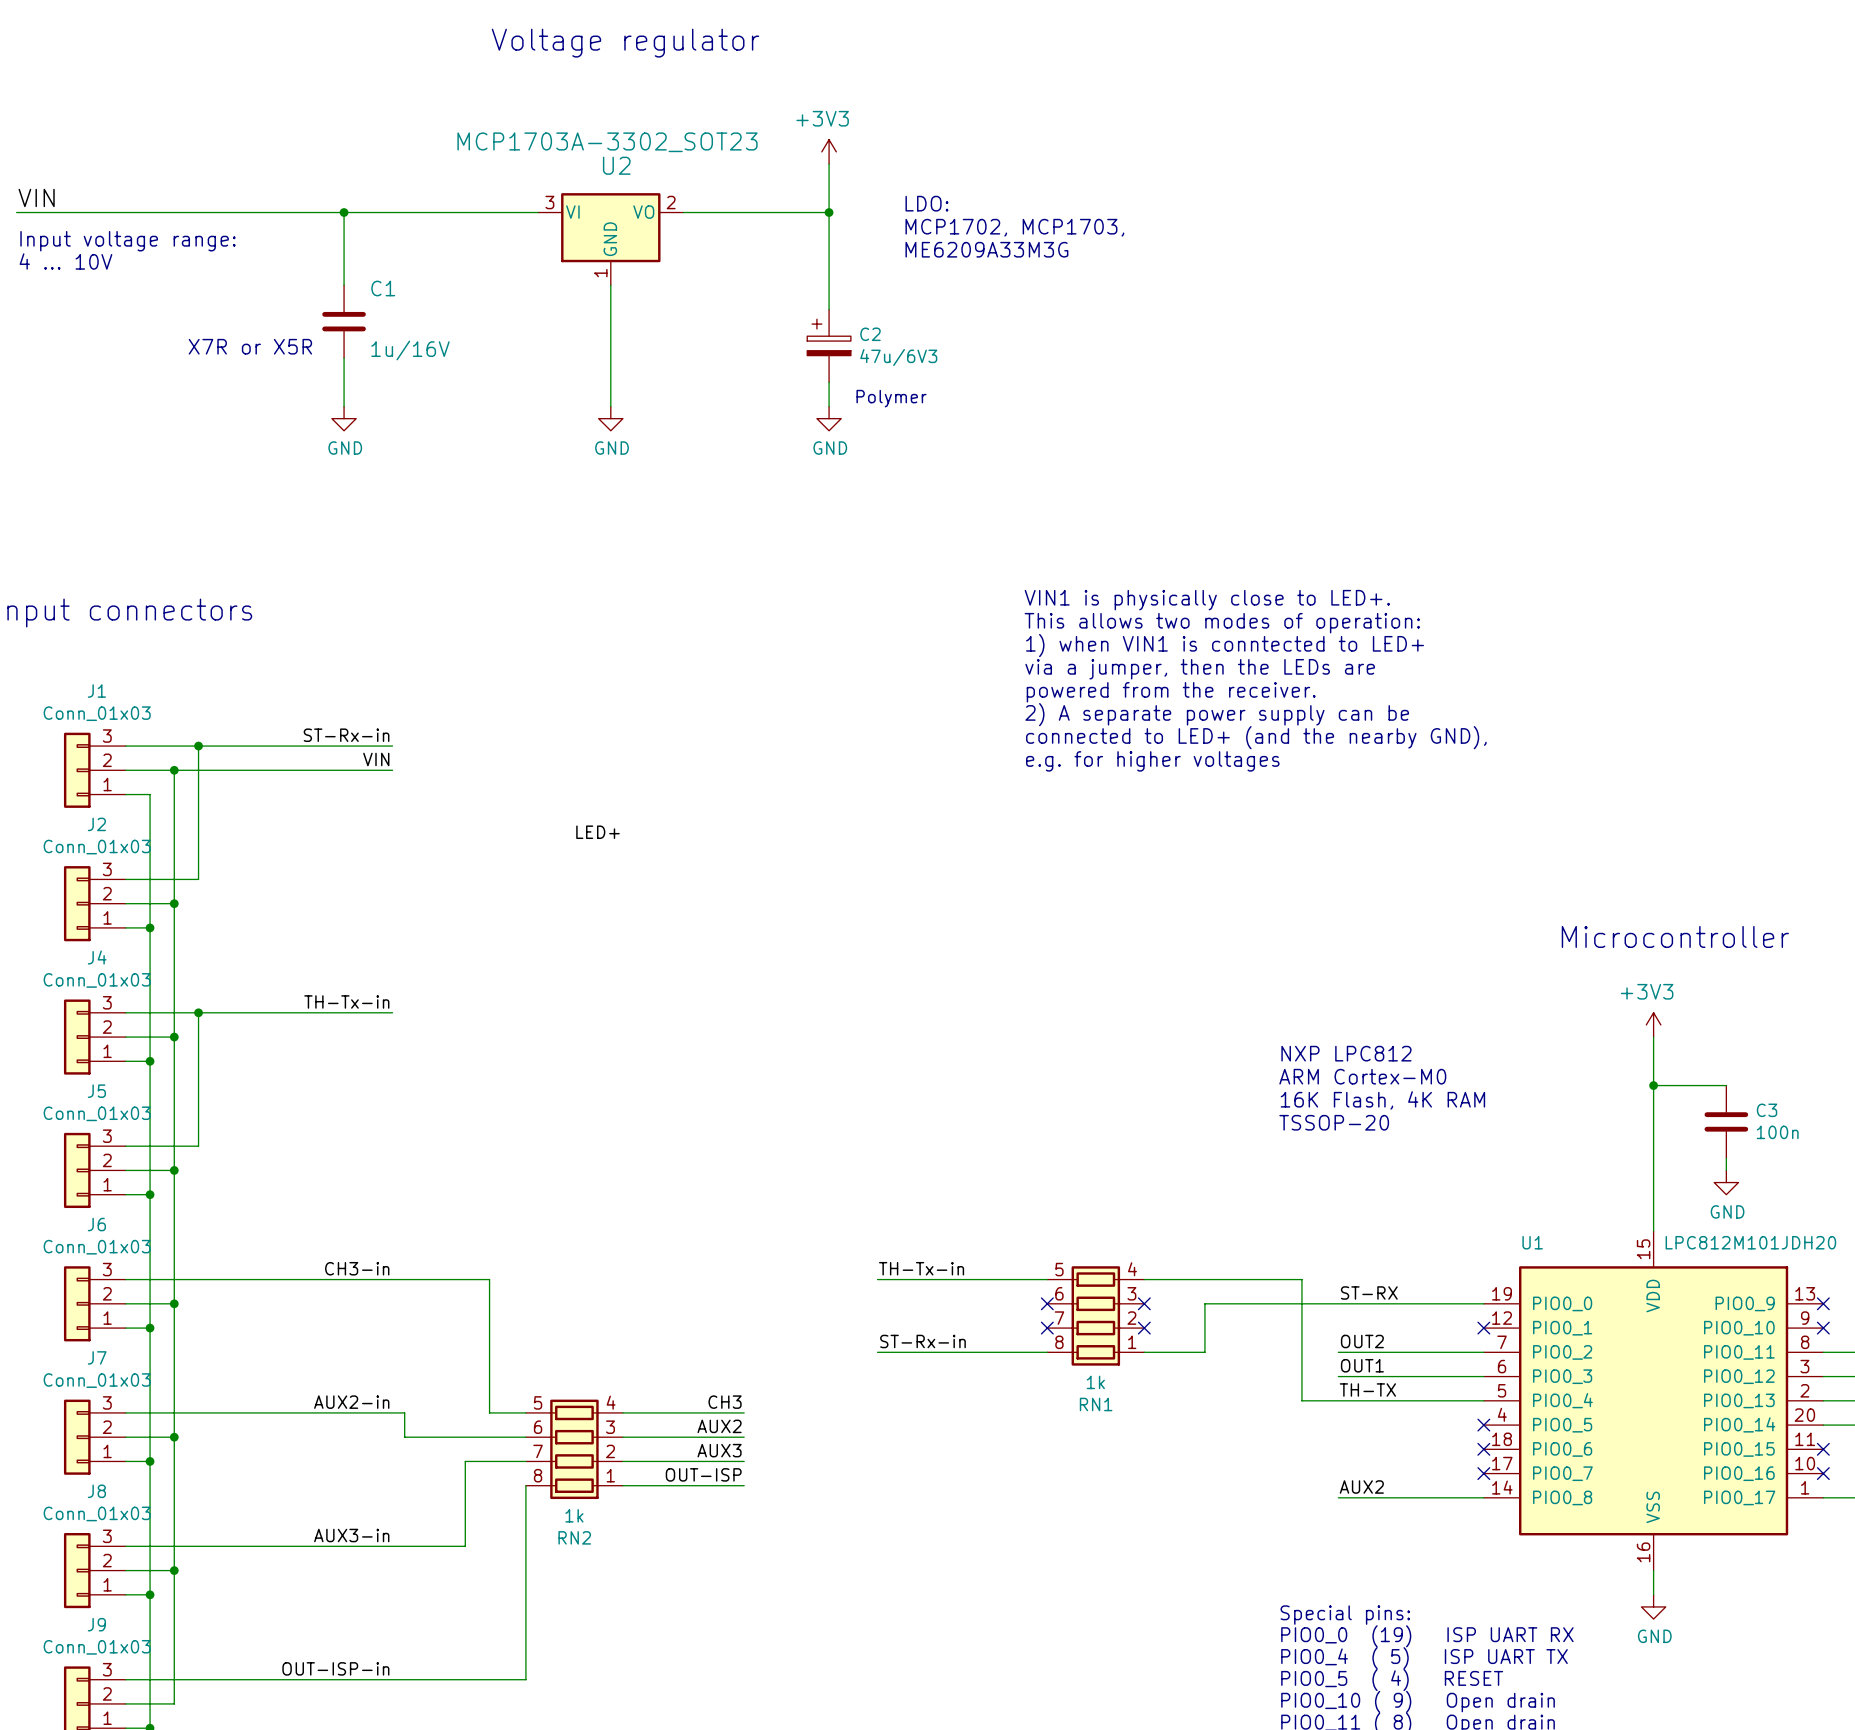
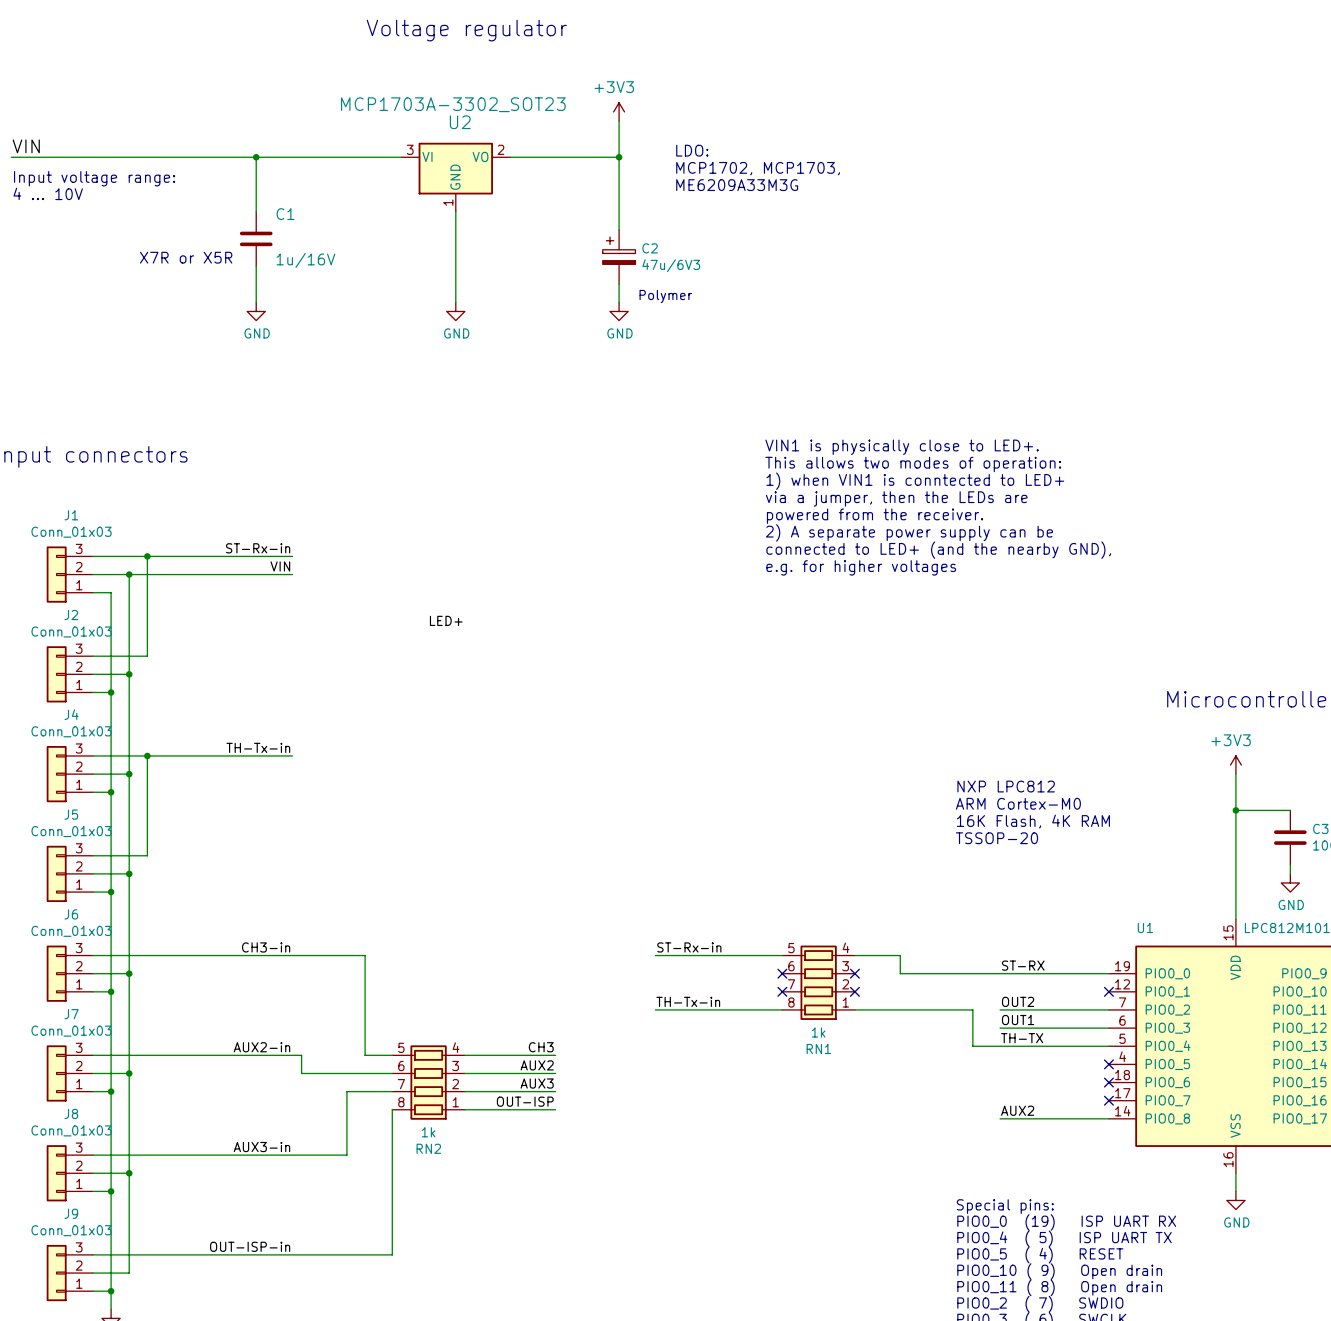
label: TH-Tx-in (921, 1268) -> ST-Rx-in (689, 947)
wire: (1204, 1279) (1301, 1279) (1301, 1352) -> (900, 1009) (972, 1009)
wire: (1204, 1303) (1204, 1352) -> (900, 973) (900, 955)
label: ST-Rx-in (922, 1341) -> TH-Tx-in (688, 1001)

